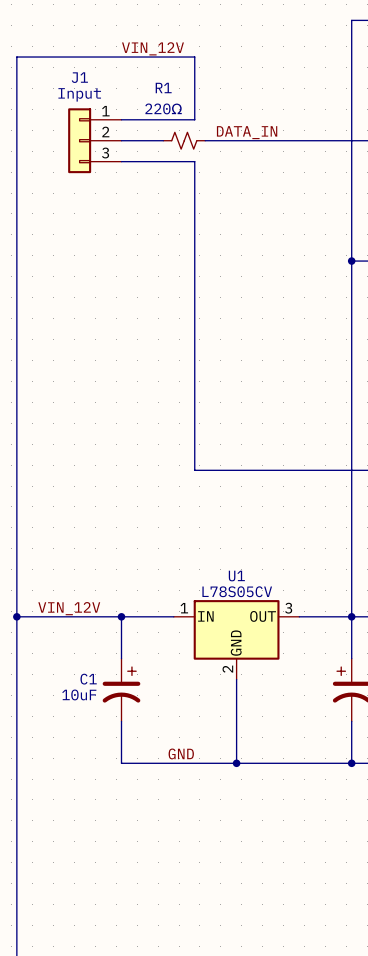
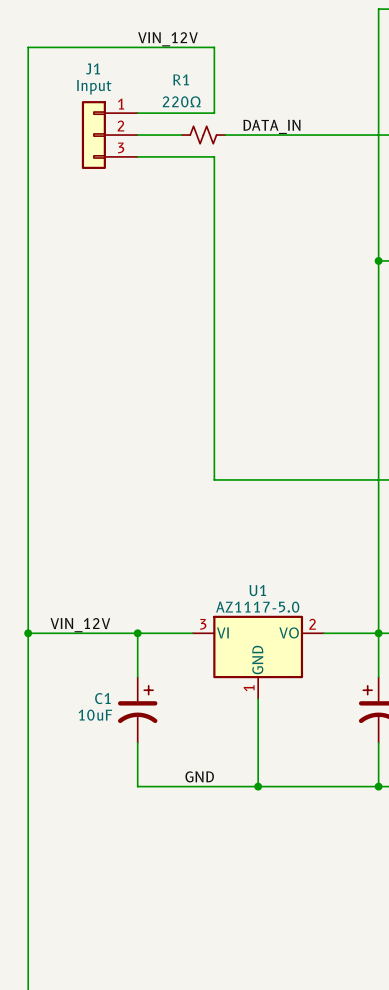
U1 value: L78S05CV (237, 591) -> AZ1117-5.0 (257, 607)
U1 pin number: 1 (184, 608) -> 3 (203, 624)
U1 pin number: 3 (288, 608) -> 2 (312, 624)
U1 pin name: IN (205, 616) -> VI (222, 632)
U1 pin name: OUT (263, 616) -> VO (289, 632)
U1 pin number: 2 (227, 669) -> 1 (249, 688)

